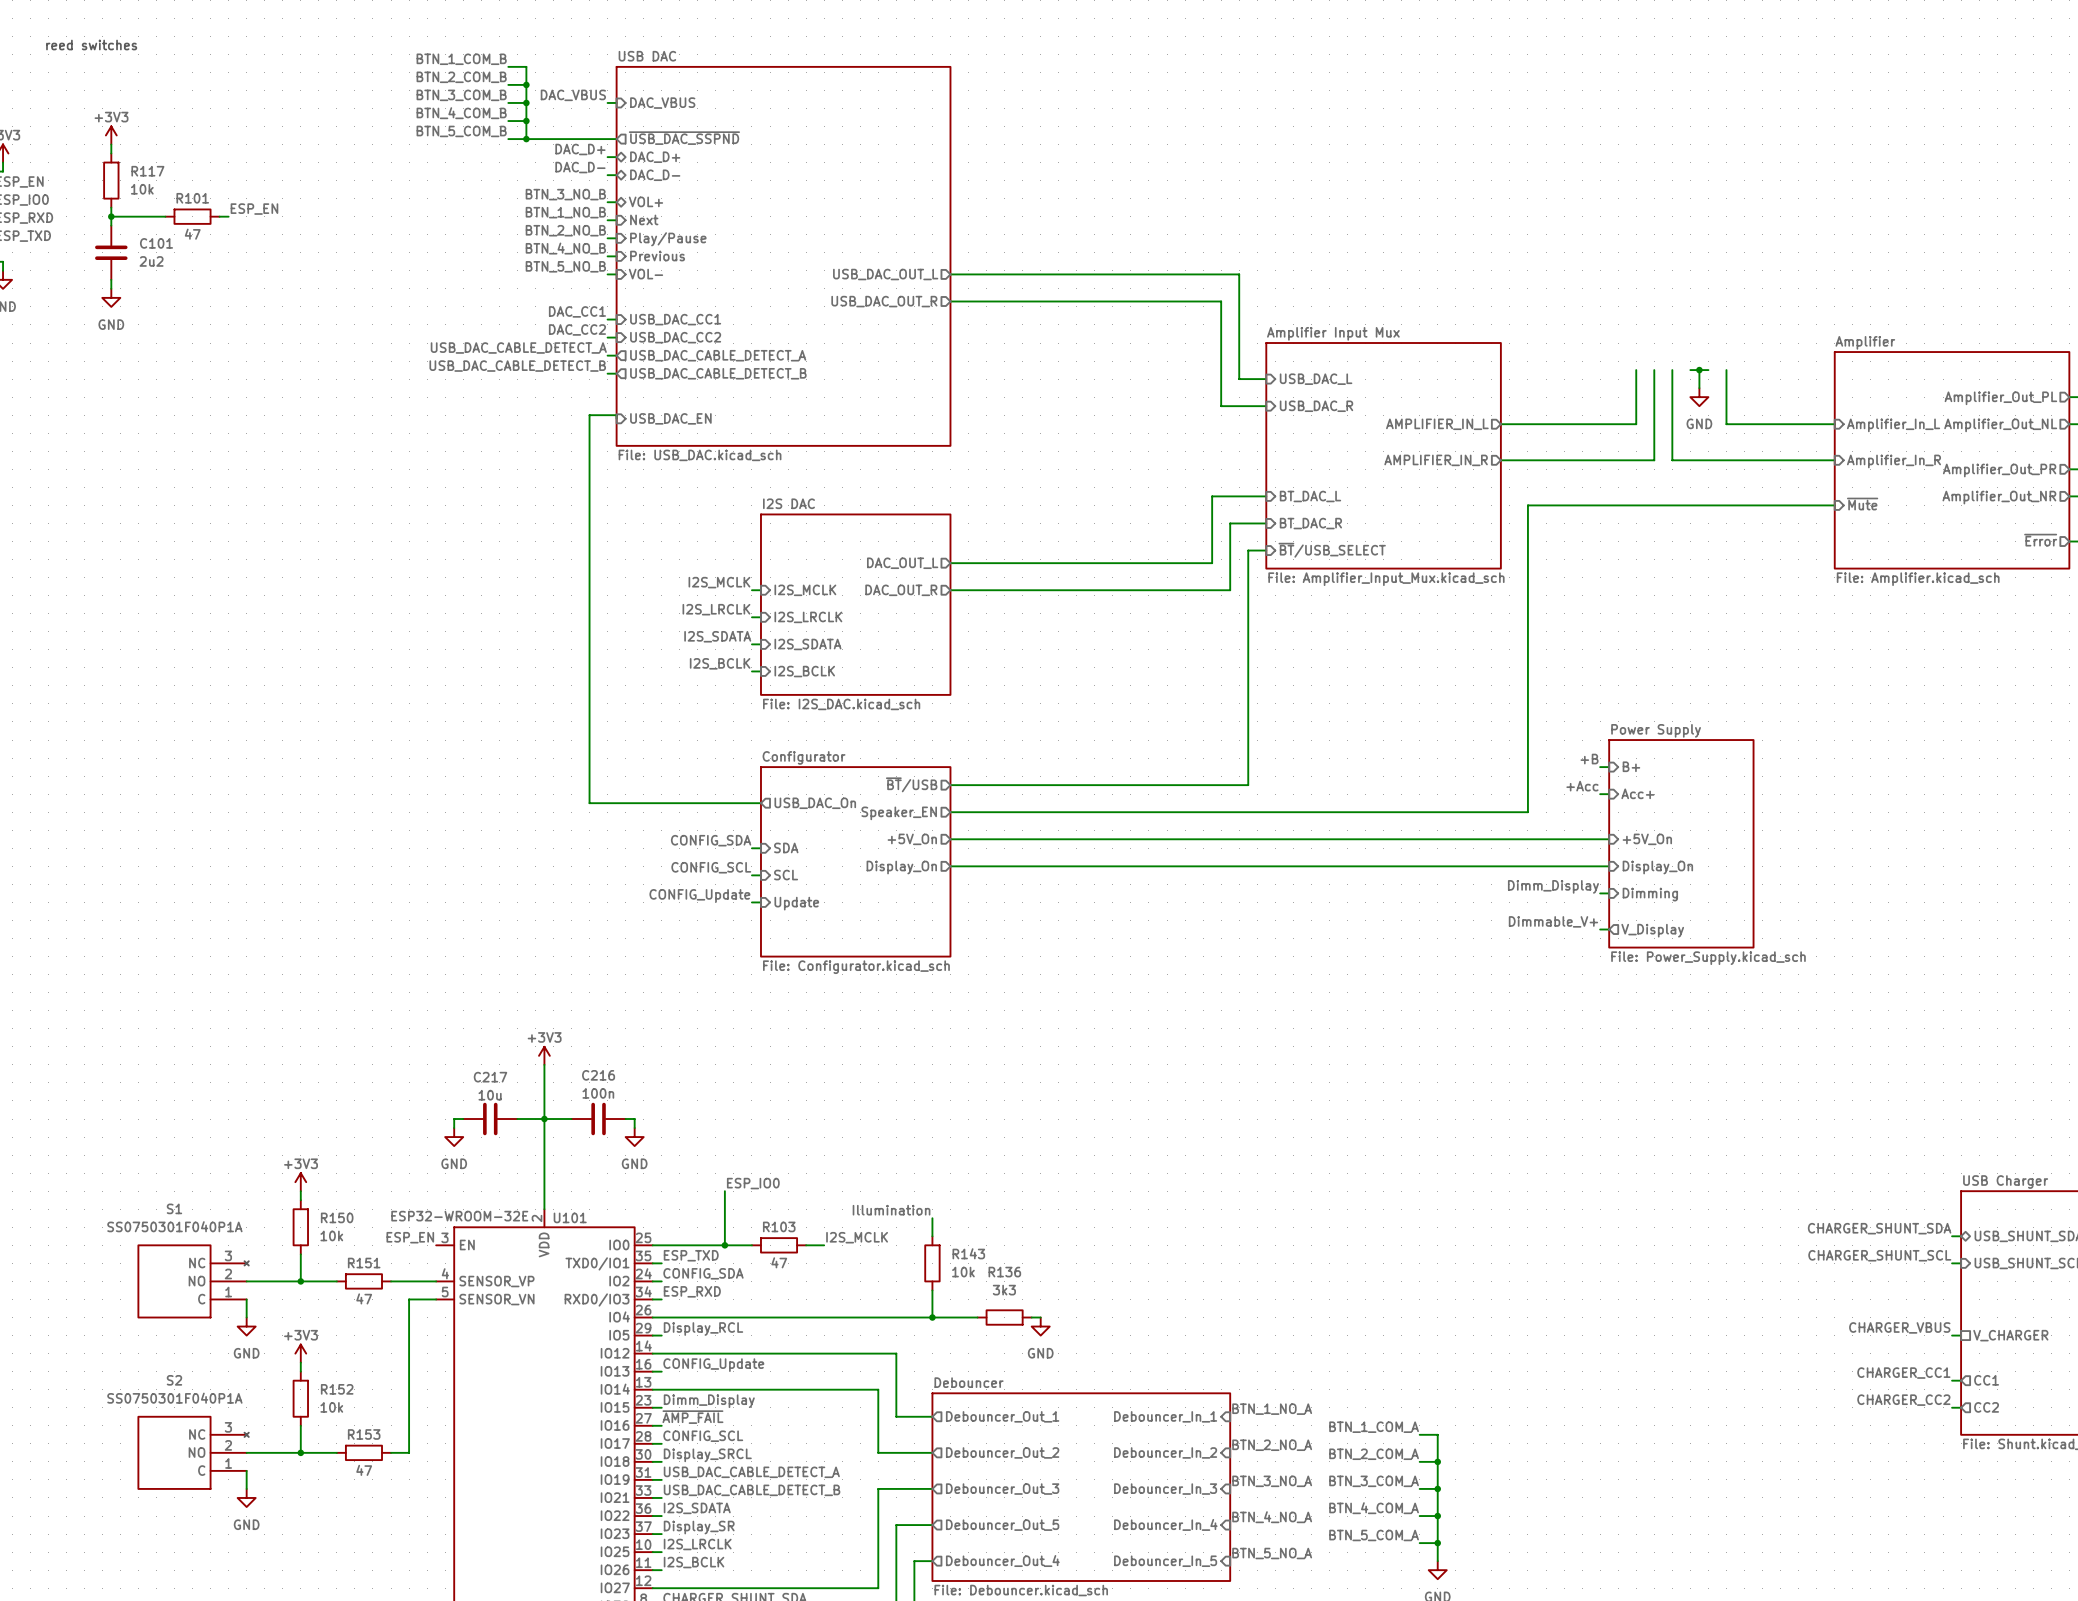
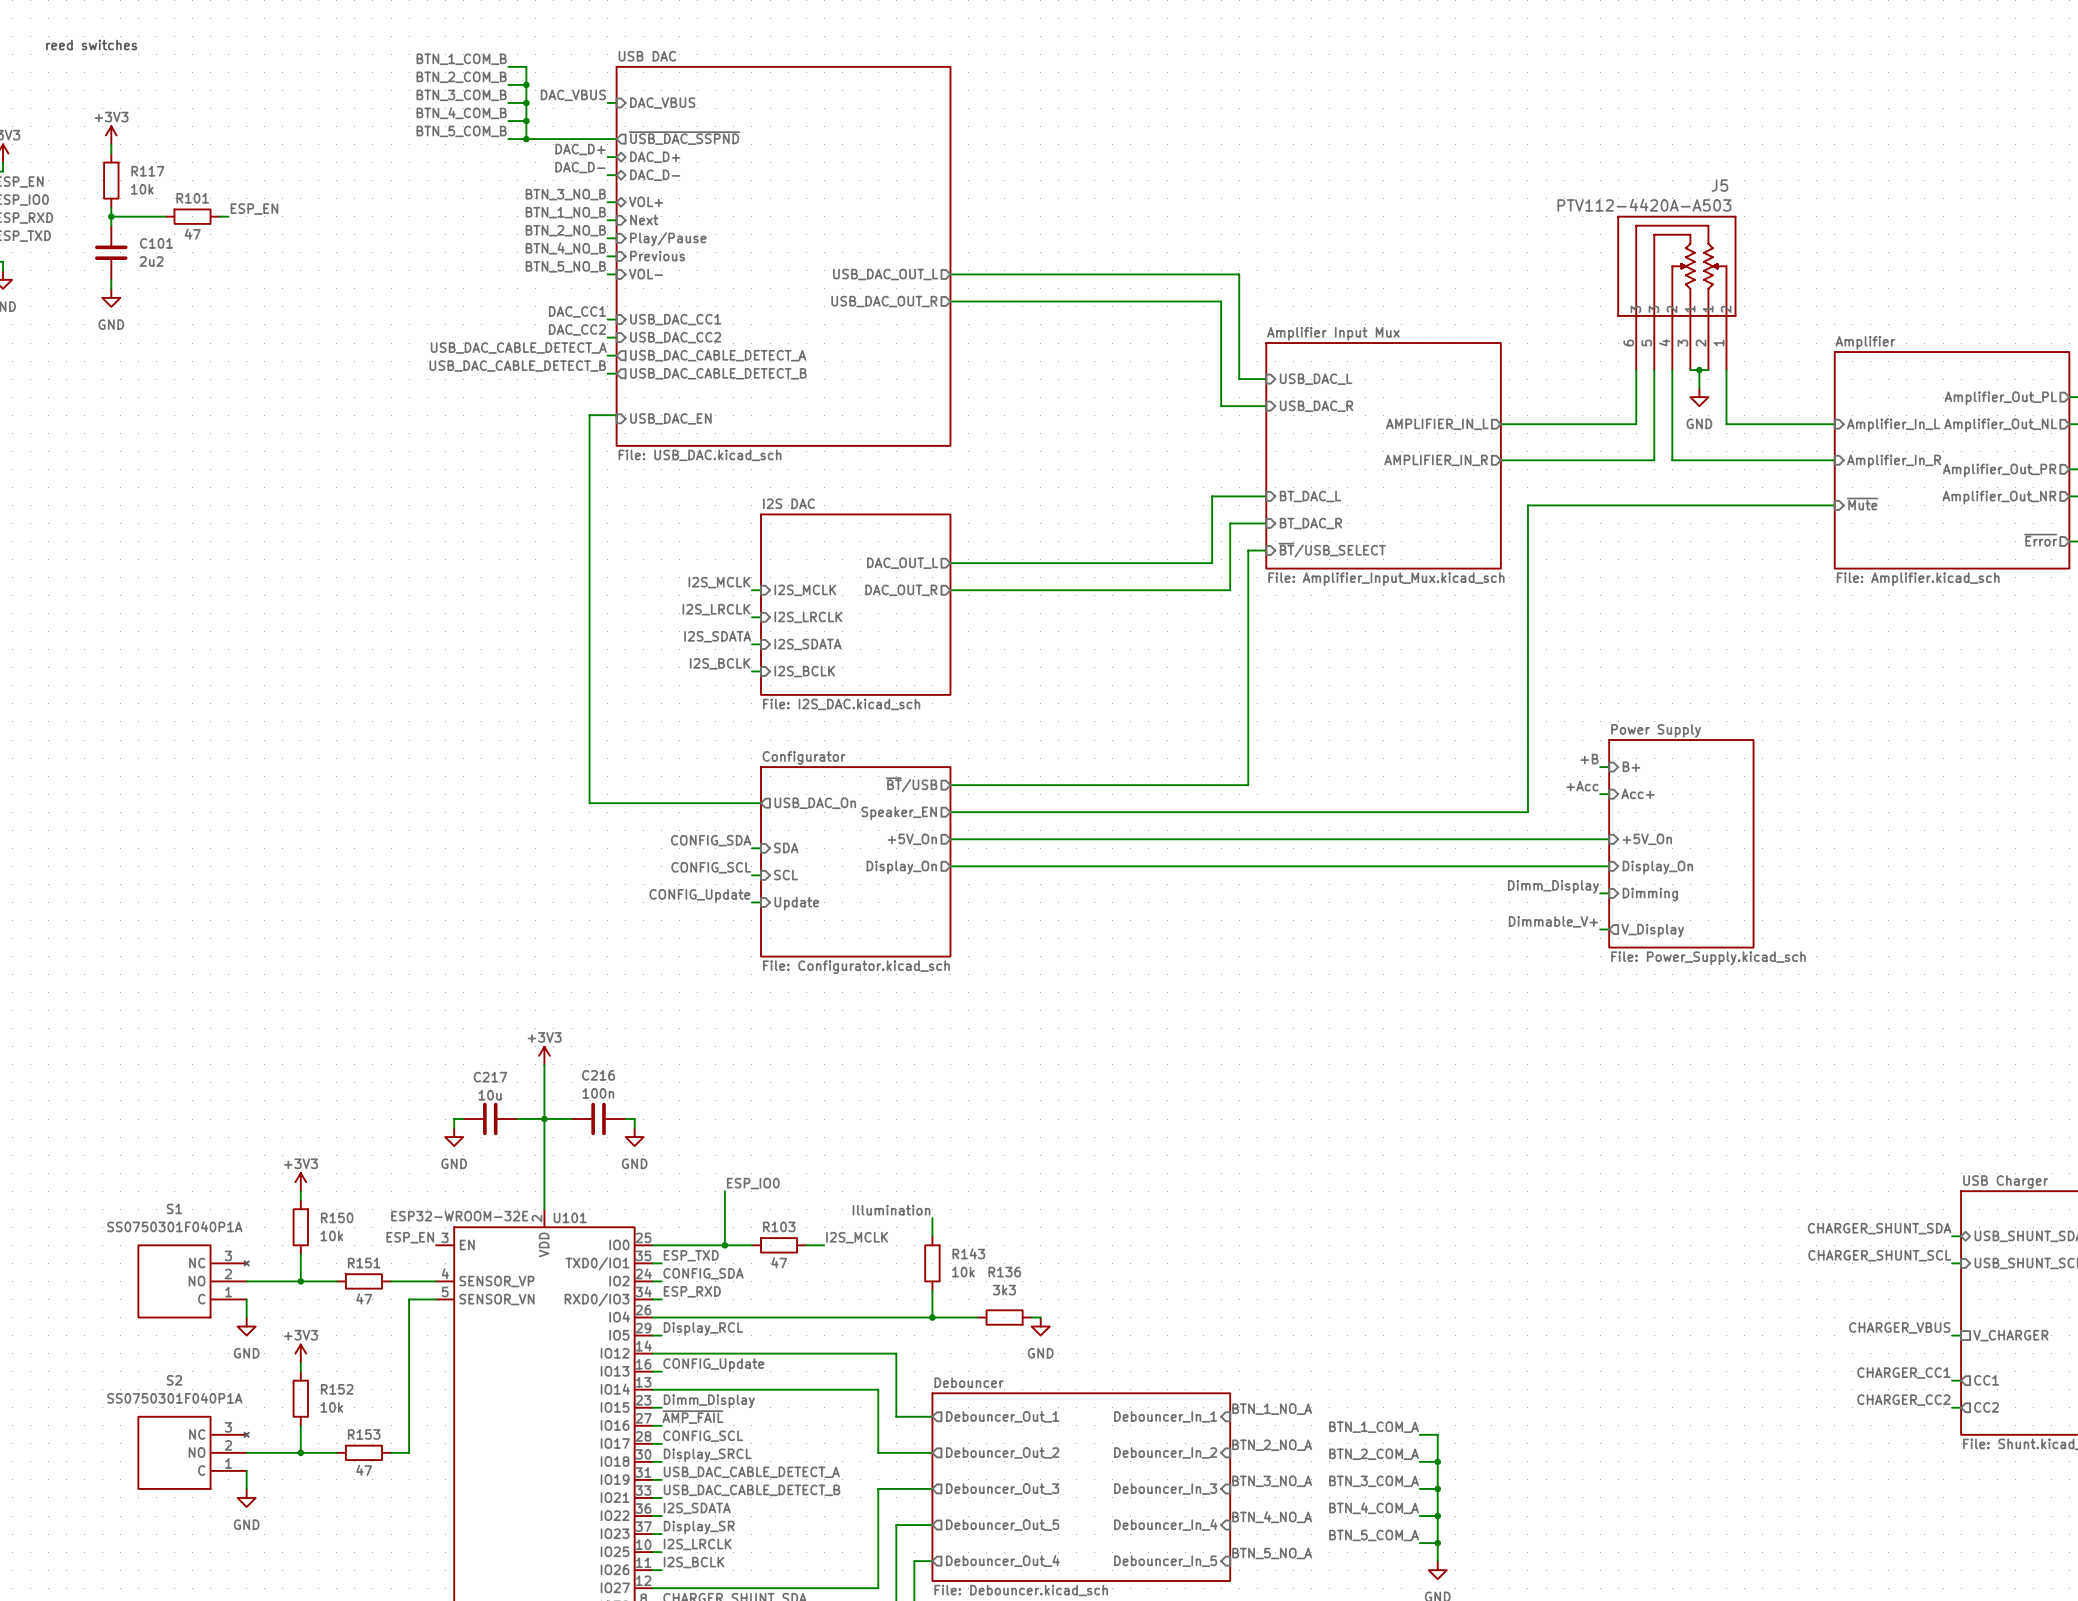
J5: none -> PTV112-4420A-A503 (1676, 293)

